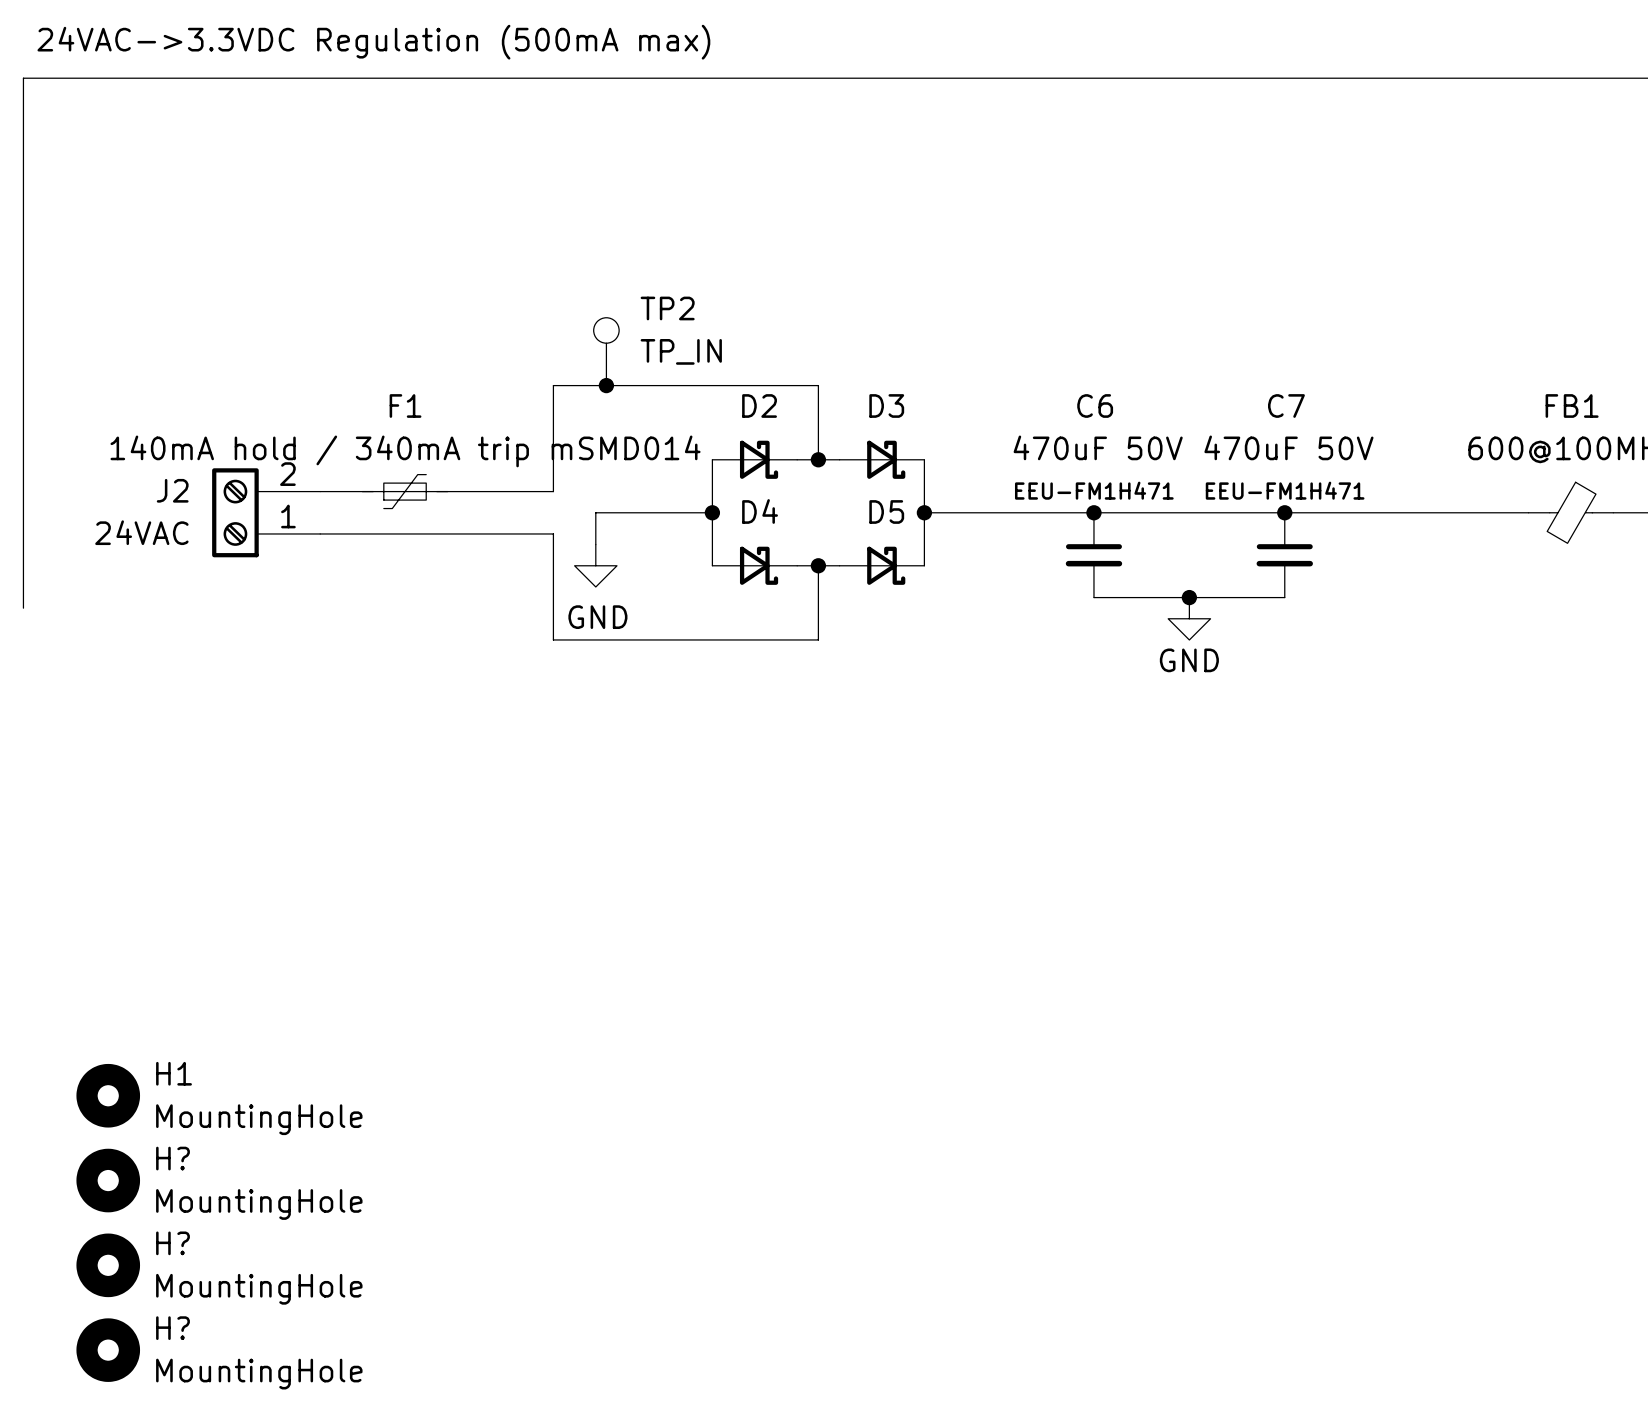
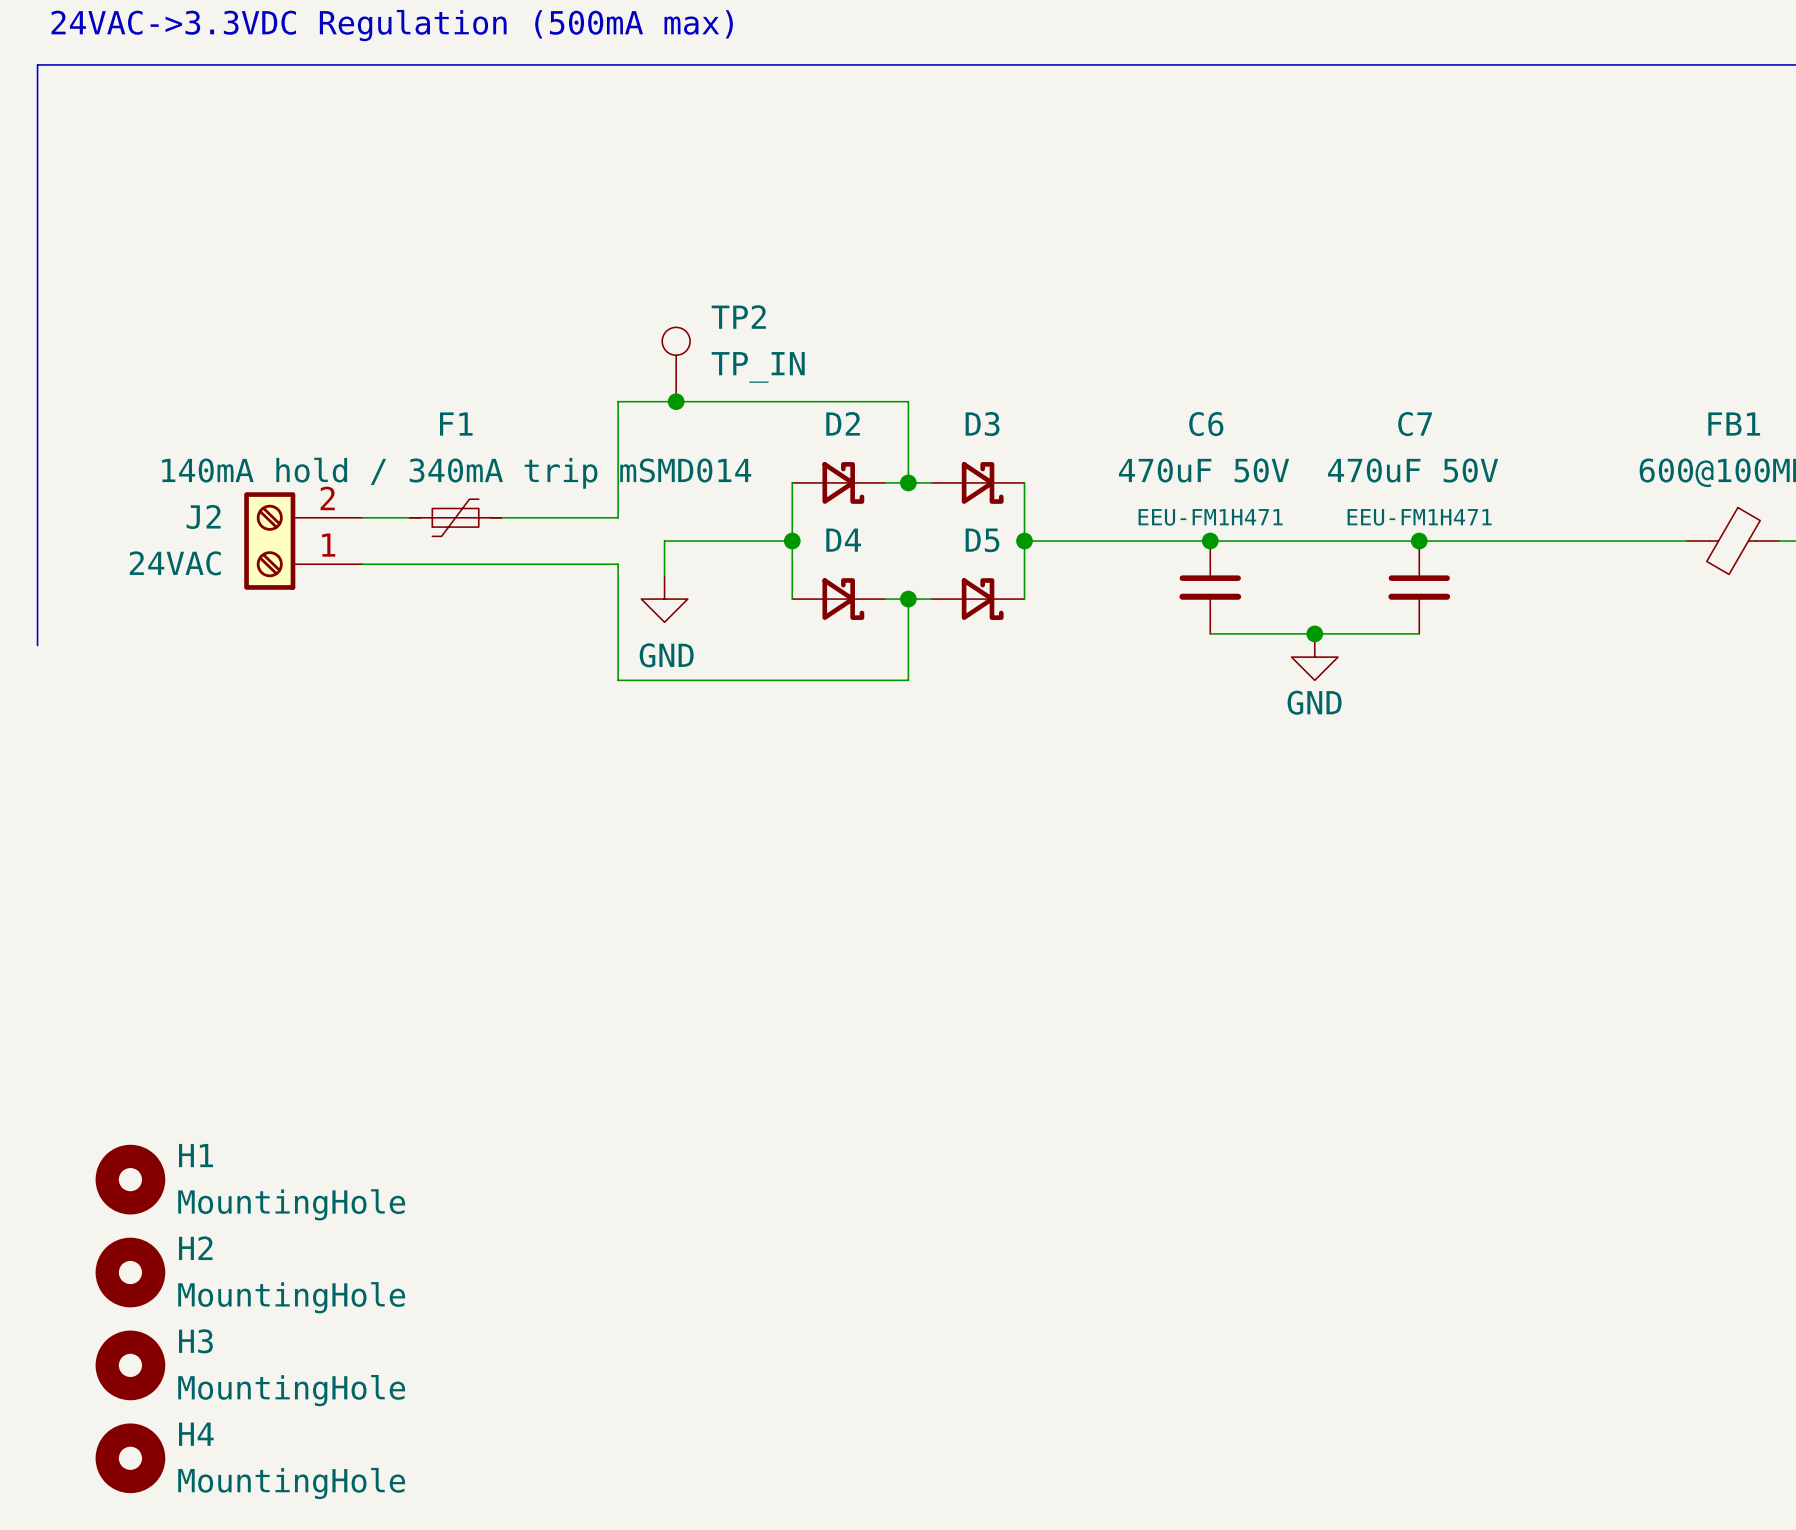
H? name: H? (173, 1158) -> H2 (195, 1248)
H? name: H? (173, 1243) -> H3 (195, 1341)
H? name: H? (173, 1328) -> H4 (196, 1434)

